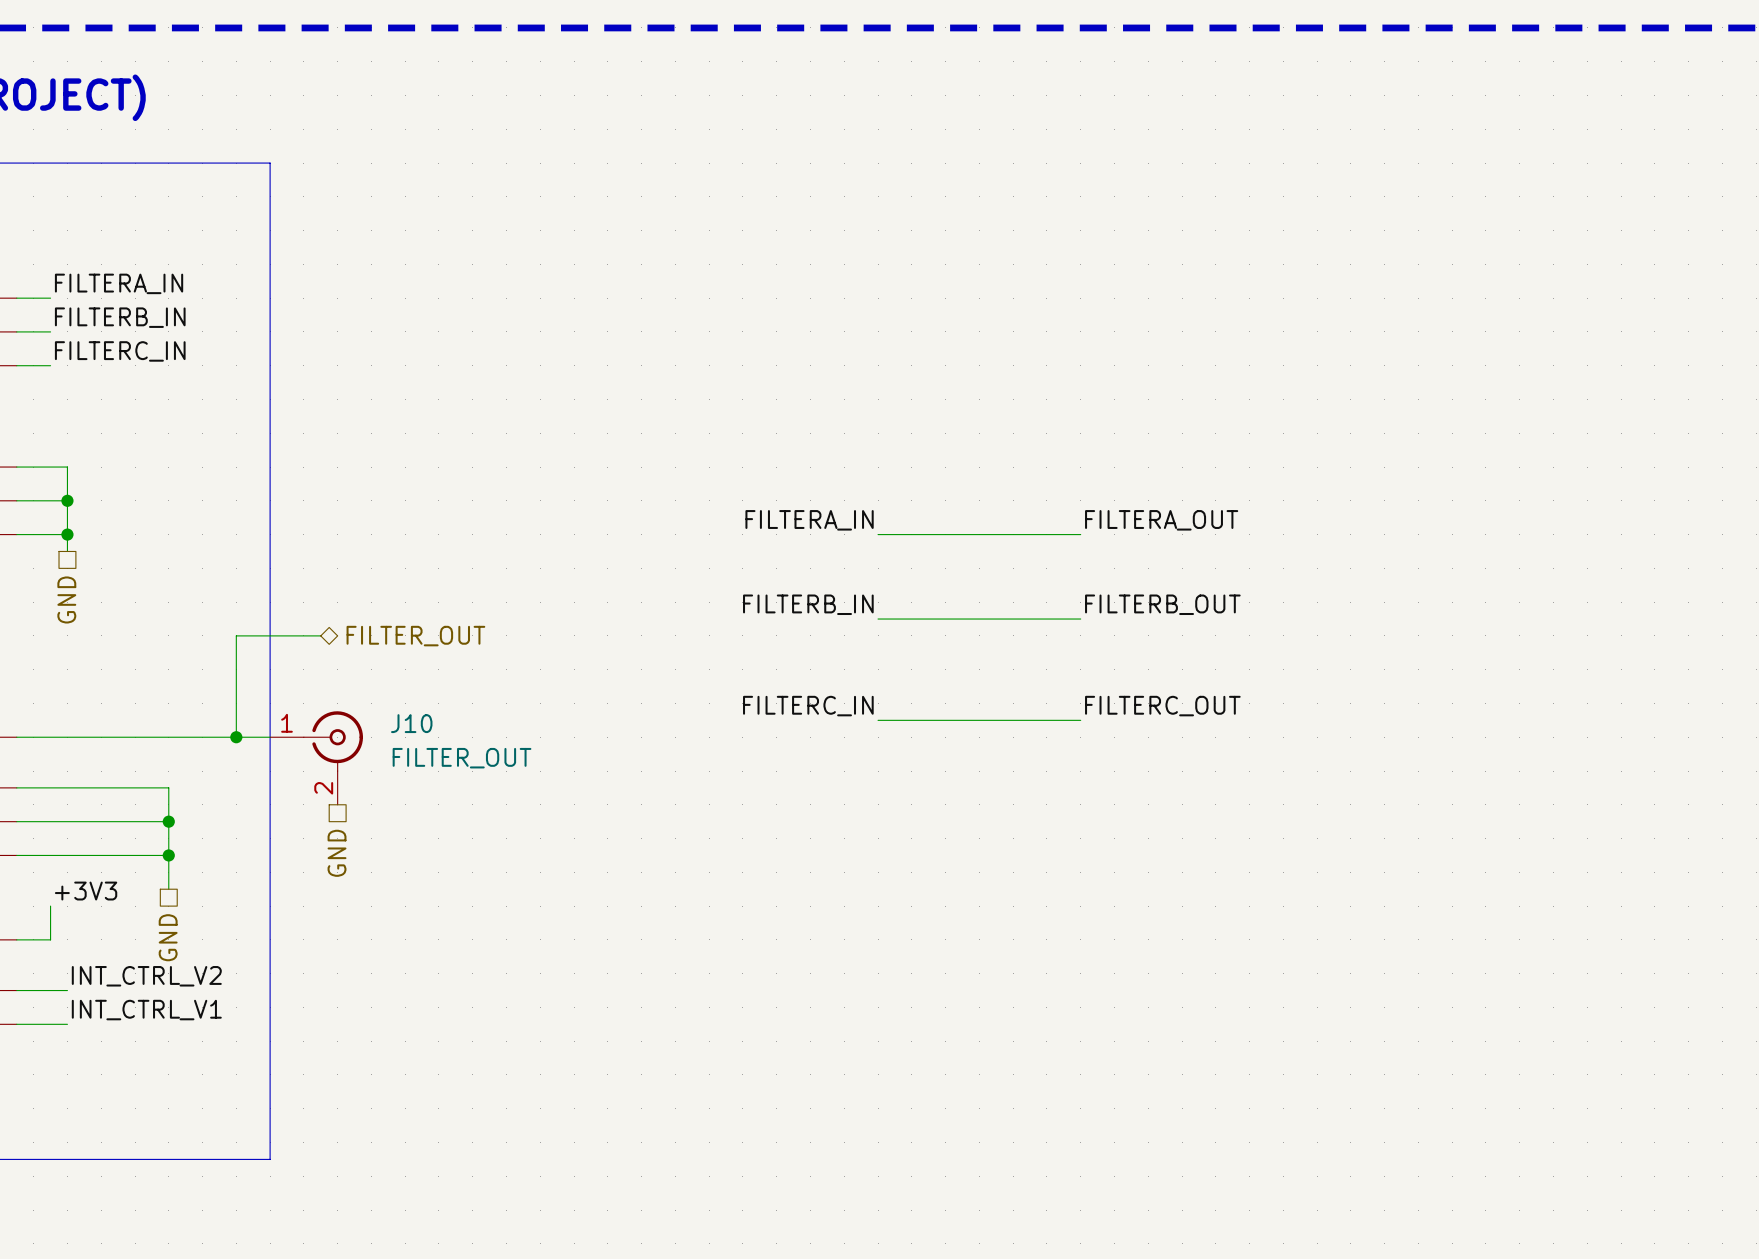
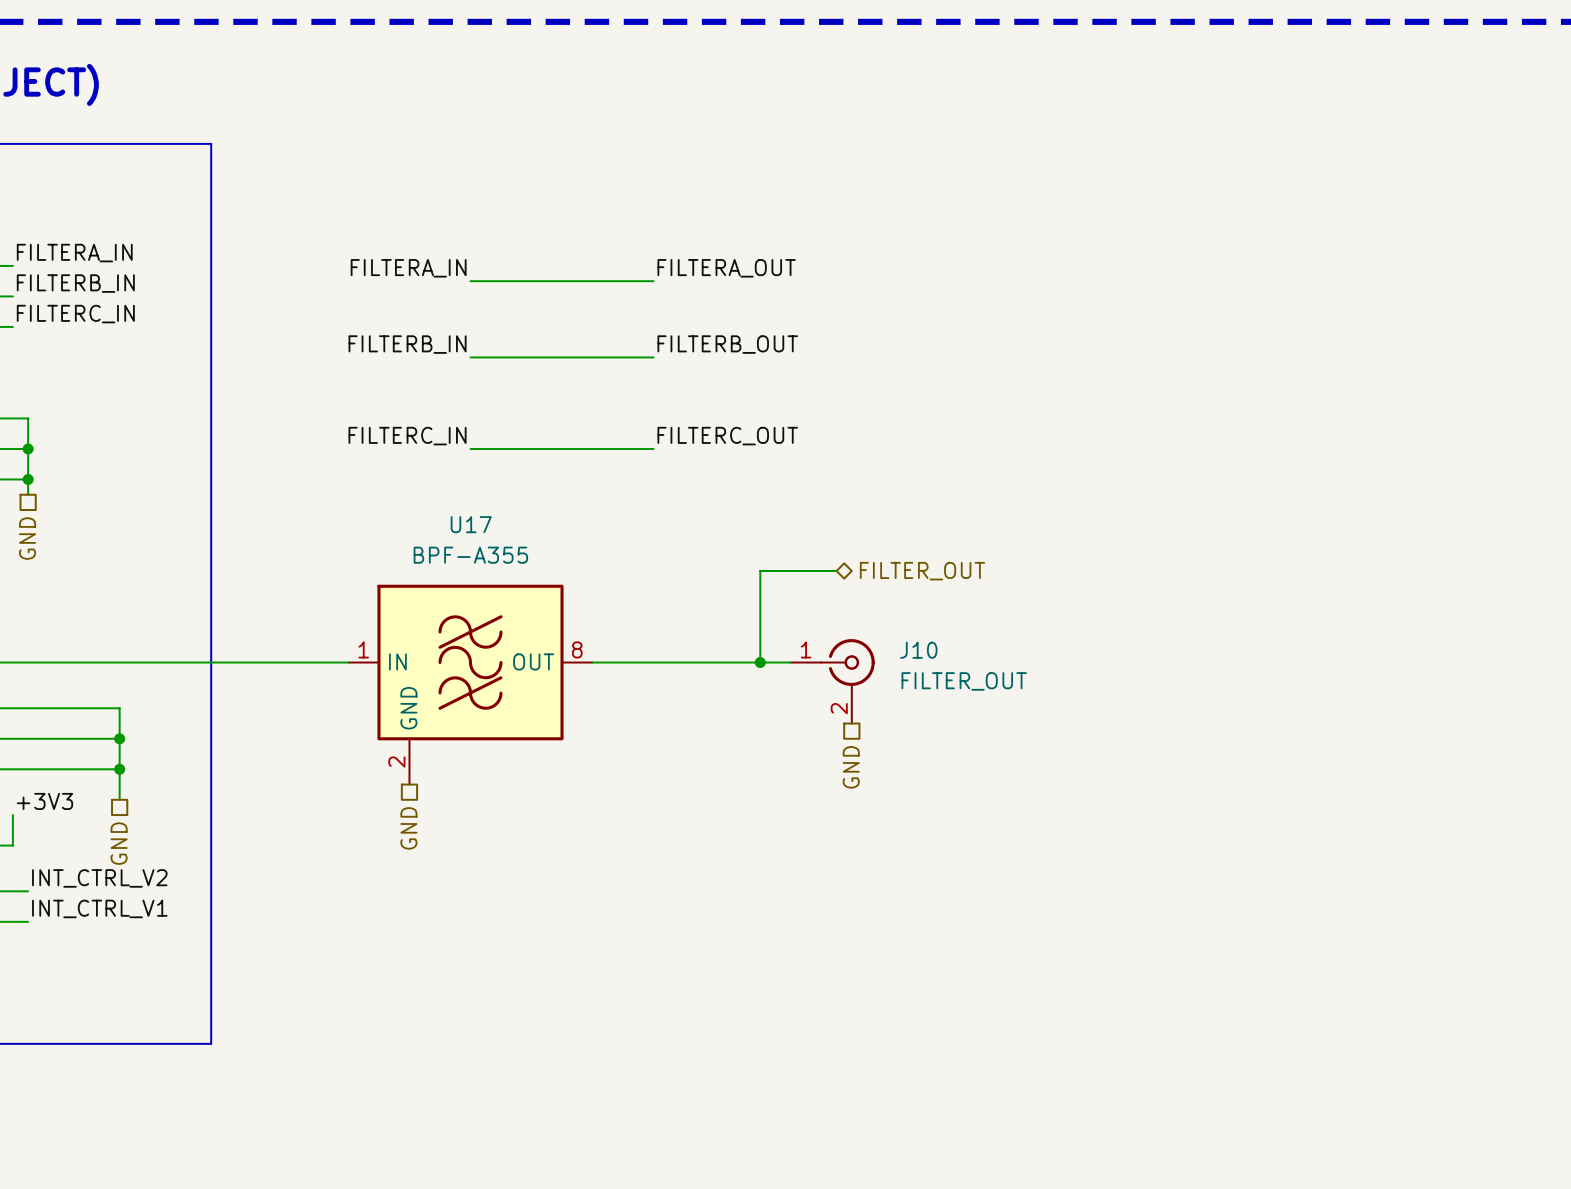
label: none -> FILTERA_IN (408, 268)
label: none -> FILTERA_OUT (726, 268)
wire: none -> (470, 281) (653, 281)
label: none -> FILTERB_IN (407, 344)
label: none -> FILTERB_OUT (727, 344)
wire: none -> (470, 357) (653, 357)
label: none -> FILTERC_IN (407, 436)
label: FILTERA_IN (809, 520) -> FILTERC_OUT (727, 436)
label: FILTERA_OUT (1161, 520) -> none
wire: (878, 534) (1080, 534) -> (470, 448) (653, 448)
label: FILTERB_IN (808, 604) -> none
label: FILTERB_OUT (1162, 604) -> none
wire: (878, 619) (1080, 619) -> none
wire: (320, 635) (236, 635) (236, 737) -> none
wire: none -> (836, 571) (760, 571) (760, 662)
hierarchical label: FILTER_OUT (415, 636) -> none
hierarchical label: none -> FILTER_OUT (922, 571)
label: FILTERC_IN (808, 706) -> none
label: FILTERC_OUT (1162, 706) -> none
wire: (878, 720) (1080, 720) -> none
junction: (236, 737) -> none
wire: none -> (211, 662) (348, 662)
wire: none -> (592, 662) (790, 662)
junction: none -> (760, 662)
J10 position: (316, 758) -> (832, 681)
U17: none -> BPF-A355 (470, 684)
hierarchical label position: GND (337, 853) -> GND (408, 828)
hierarchical label: none -> GND (851, 767)

